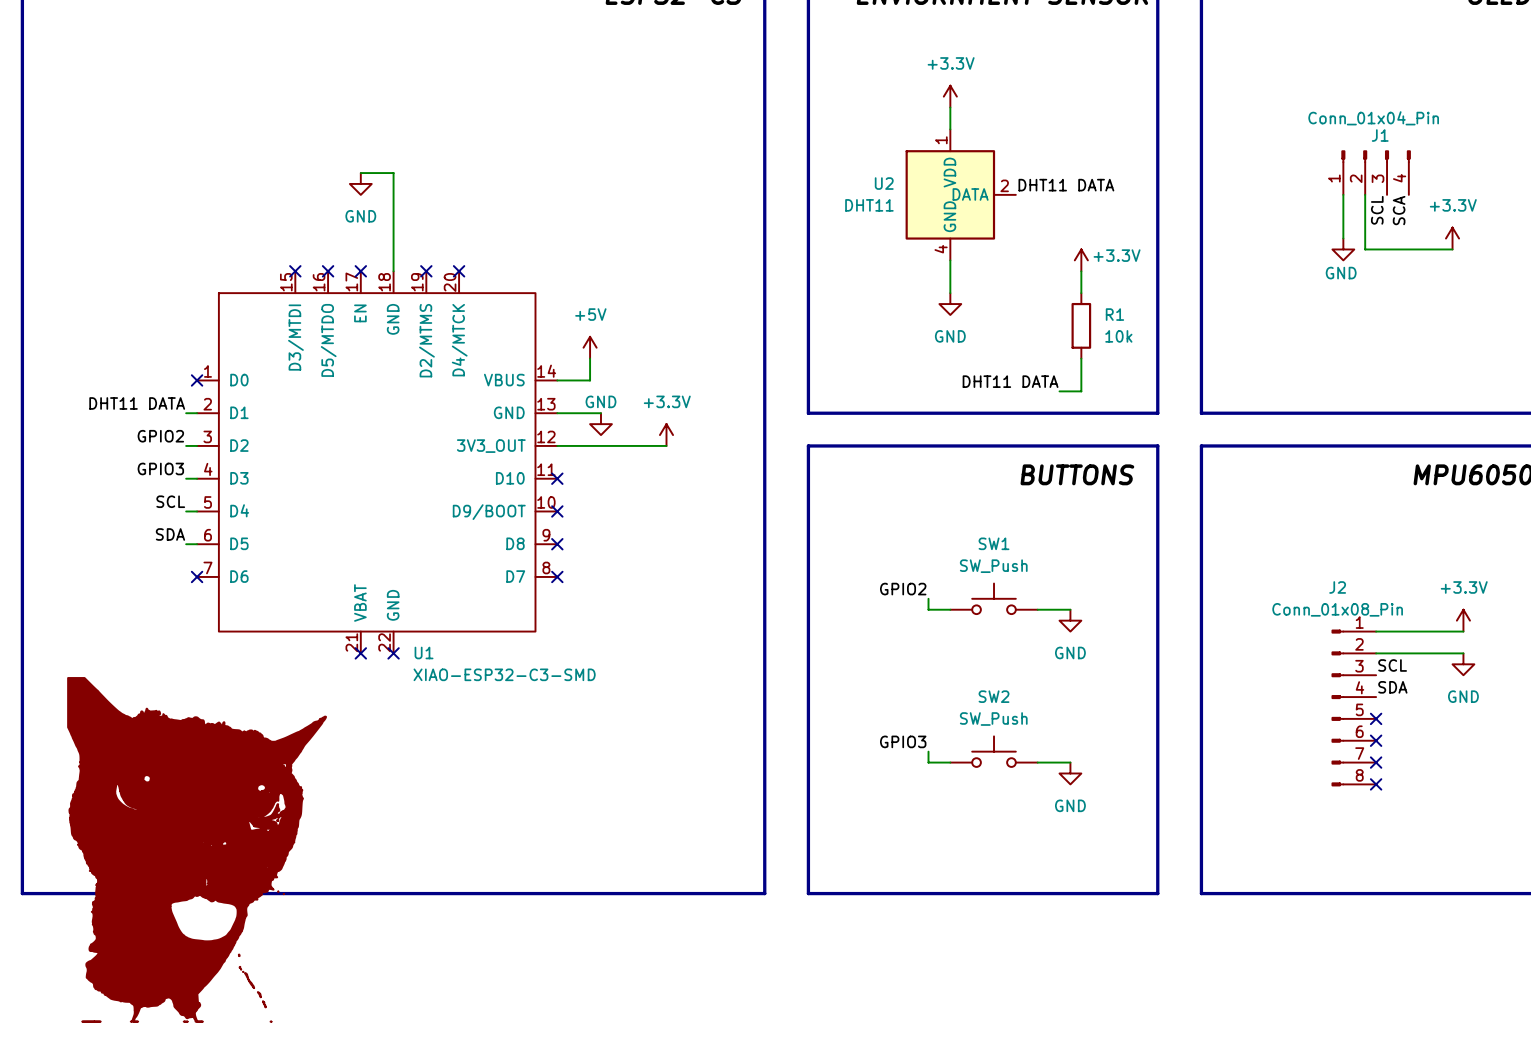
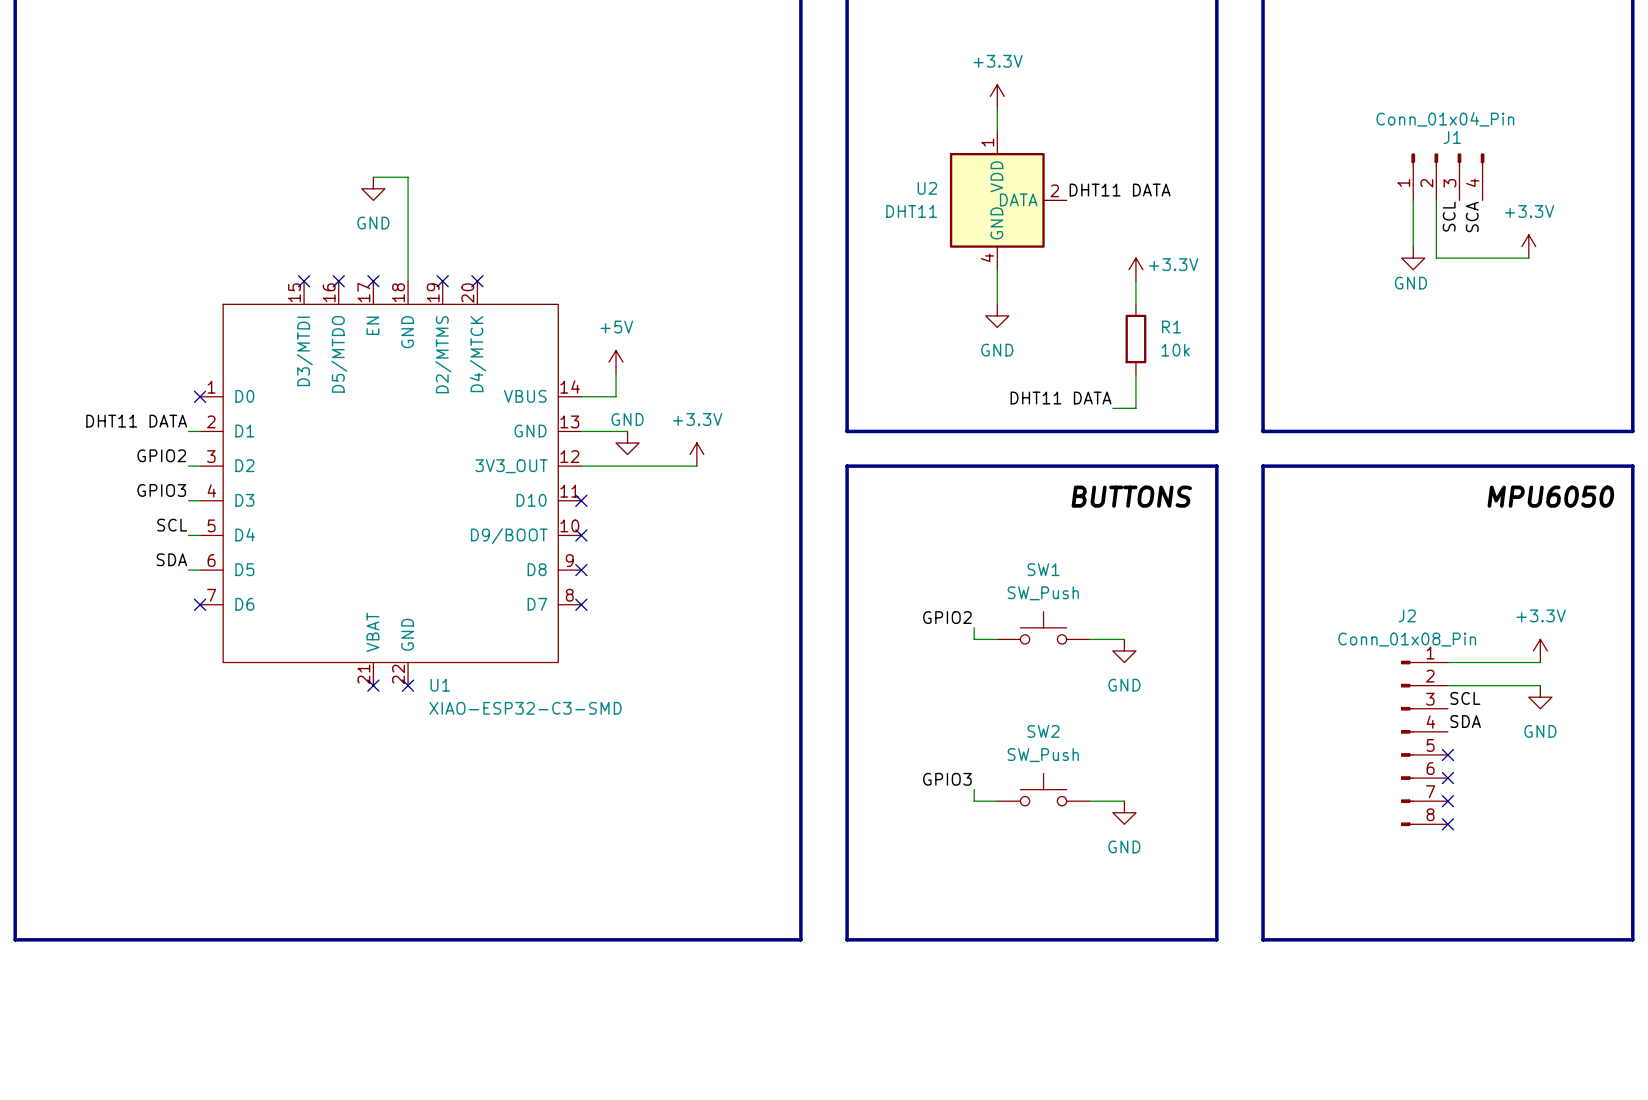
power symbol: (197, 849) -> none

